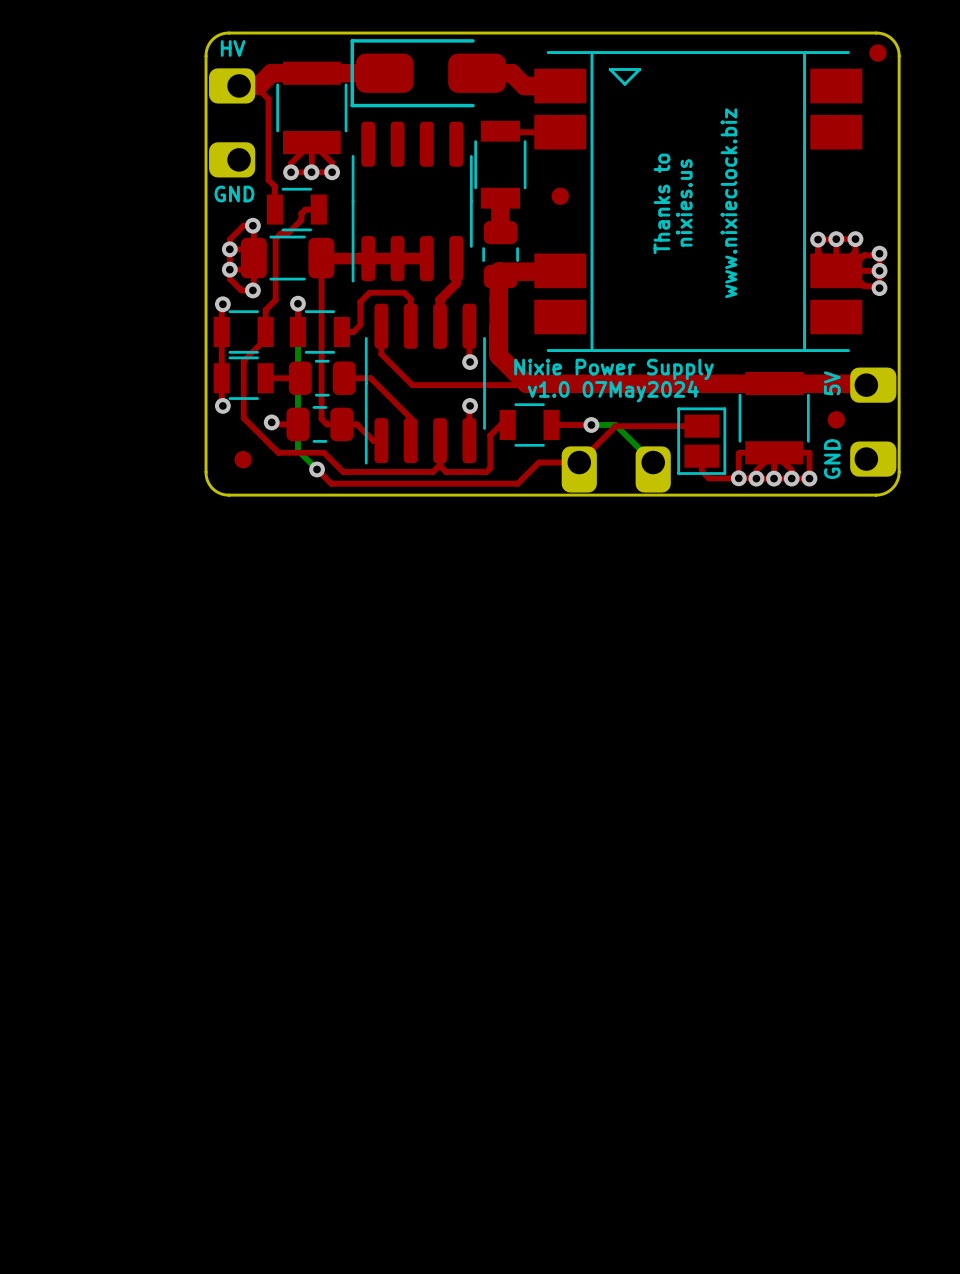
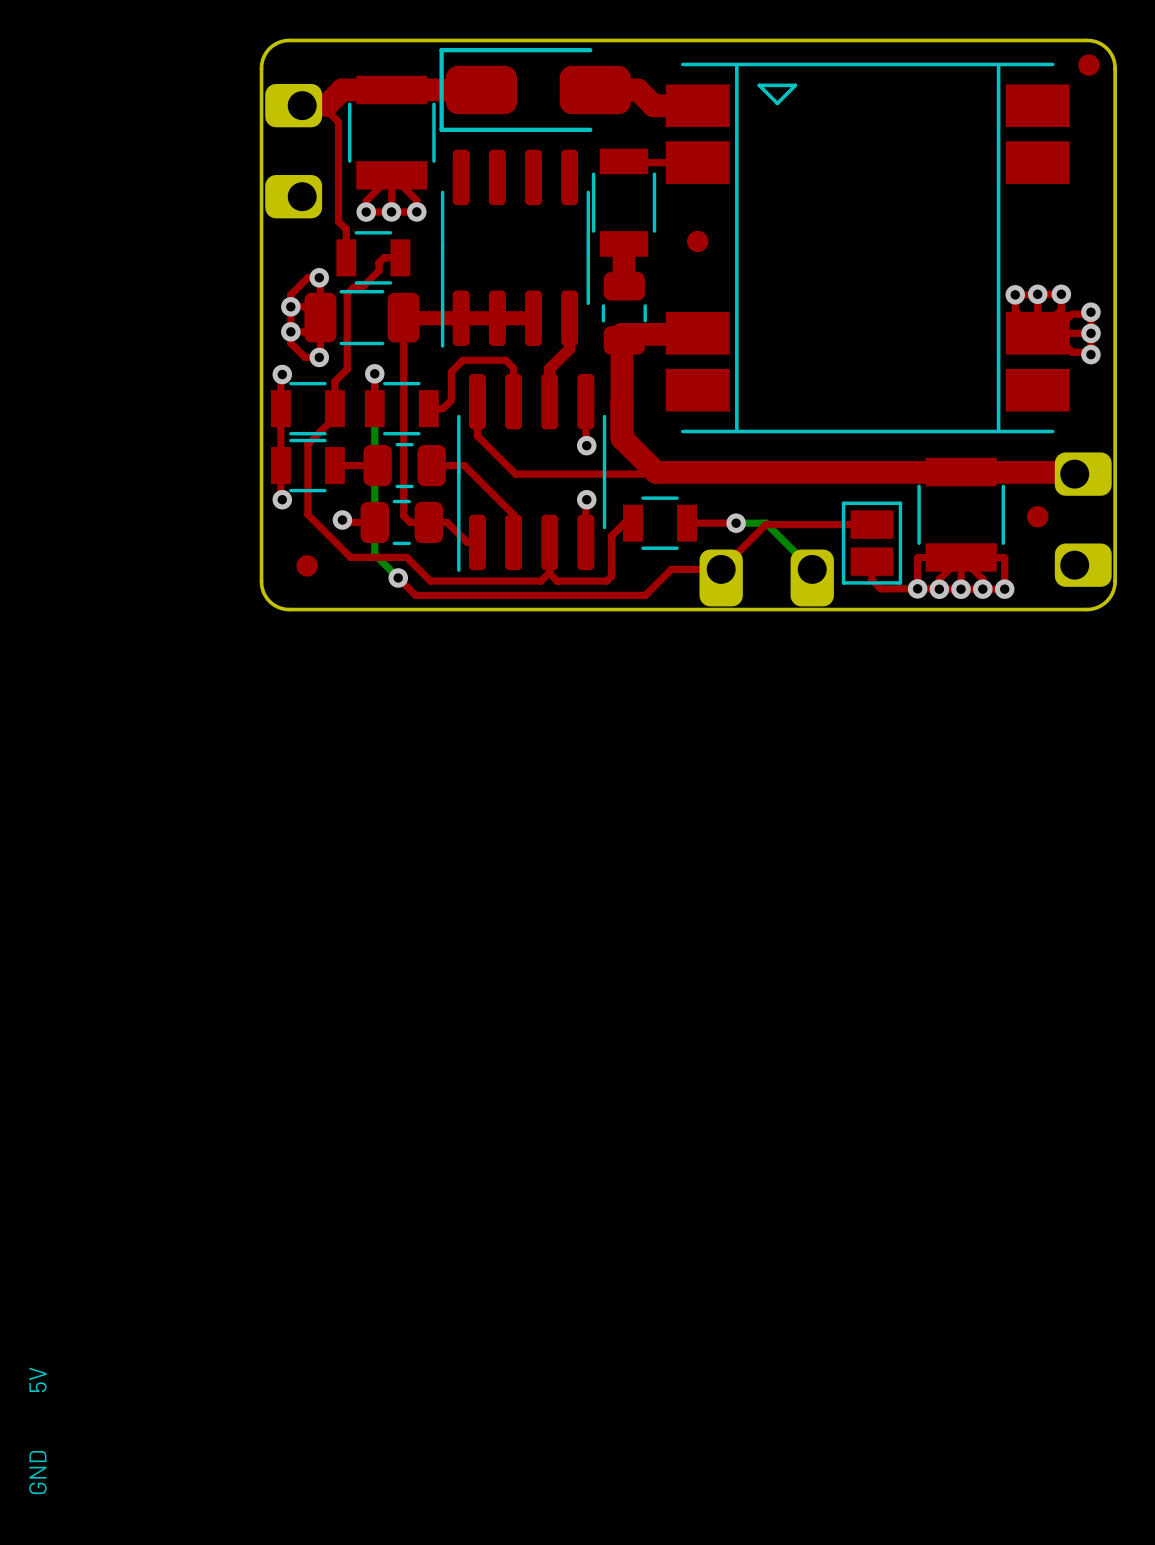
text: HV (233, 48) -> none
text: GND (234, 194) -> none
text: nixies.us (684, 202) -> none
text: Thanks to (661, 203) -> none
text: www.nixieclock.biz (728, 203) -> none
text: Nixie Power Supply (614, 369) -> none
text: 5V (832, 383) -> none
text: v1.0 07May2024 (613, 391) -> none
text: GND (832, 459) -> none
text: none -> 5V (38, 1379)
text: none -> GND (37, 1472)

